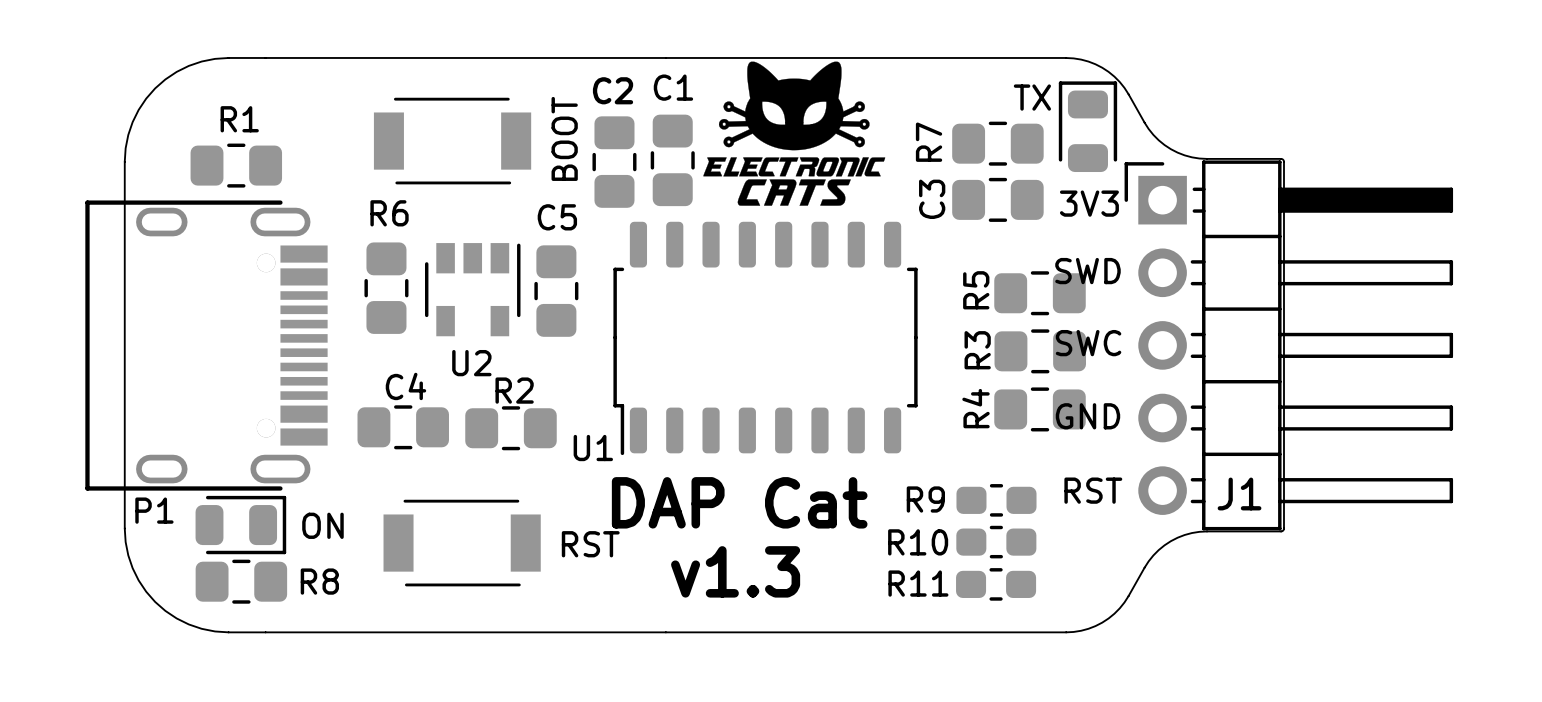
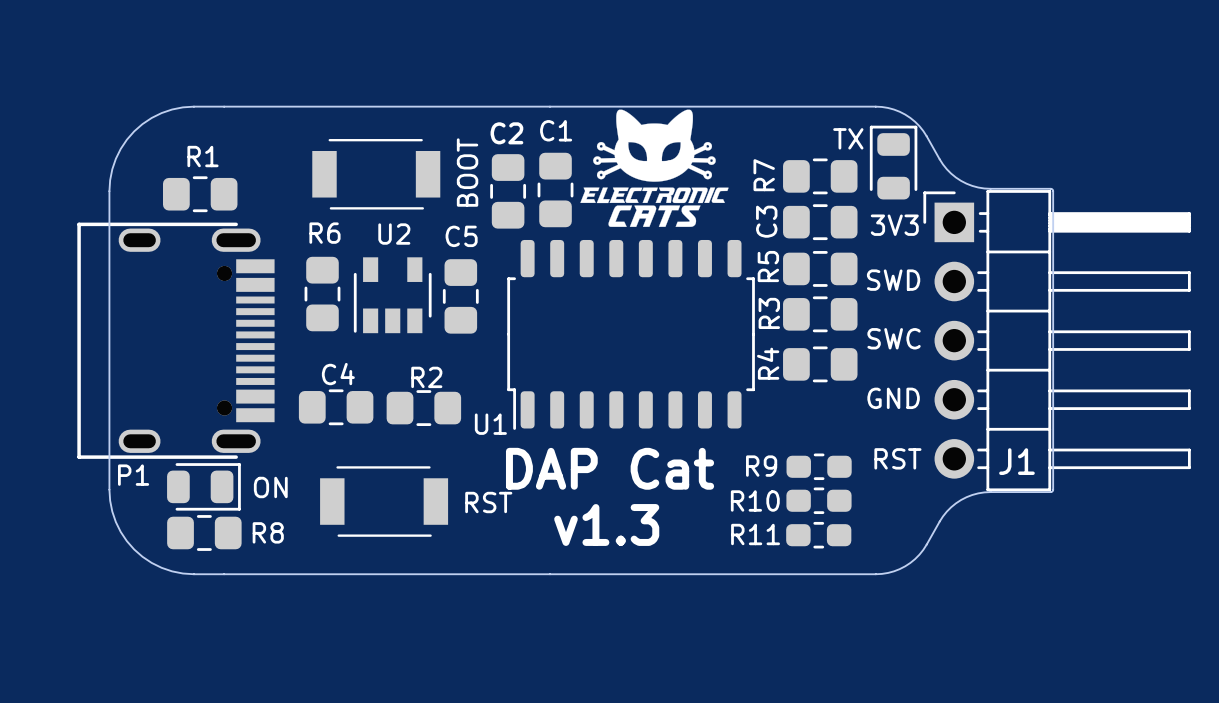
U2 rotation: 0° (472, 289) -> 180° (392, 295)
R5 position: (1040, 293) -> (820, 268)
R3 position: (1040, 351) -> (820, 314)
R4 position: (1040, 409) -> (820, 364)

